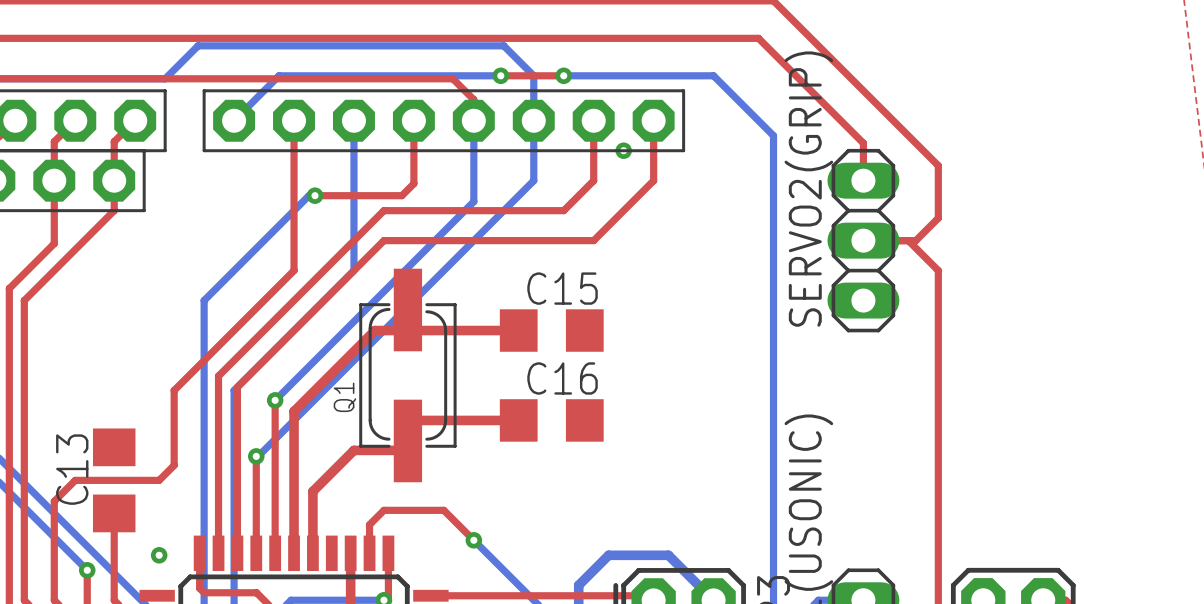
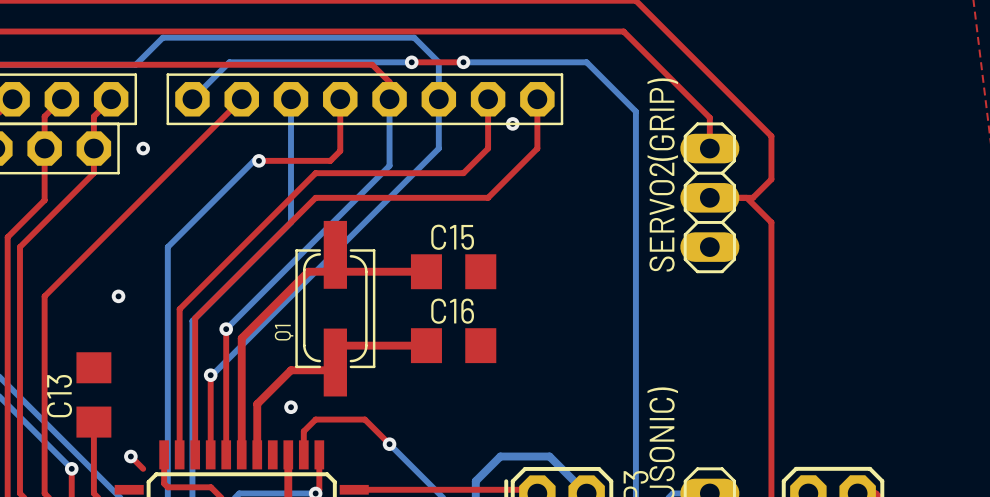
top track: (294, 120) (294, 270) (174, 390) (174, 465) (159, 480) (75, 480) (54, 501) -> (241, 99) (44, 296) (44, 412)
via: none -> (143, 148)
via: none -> (118, 296)
via: none -> (291, 407)
top track: none -> (130, 456) (143, 468)

